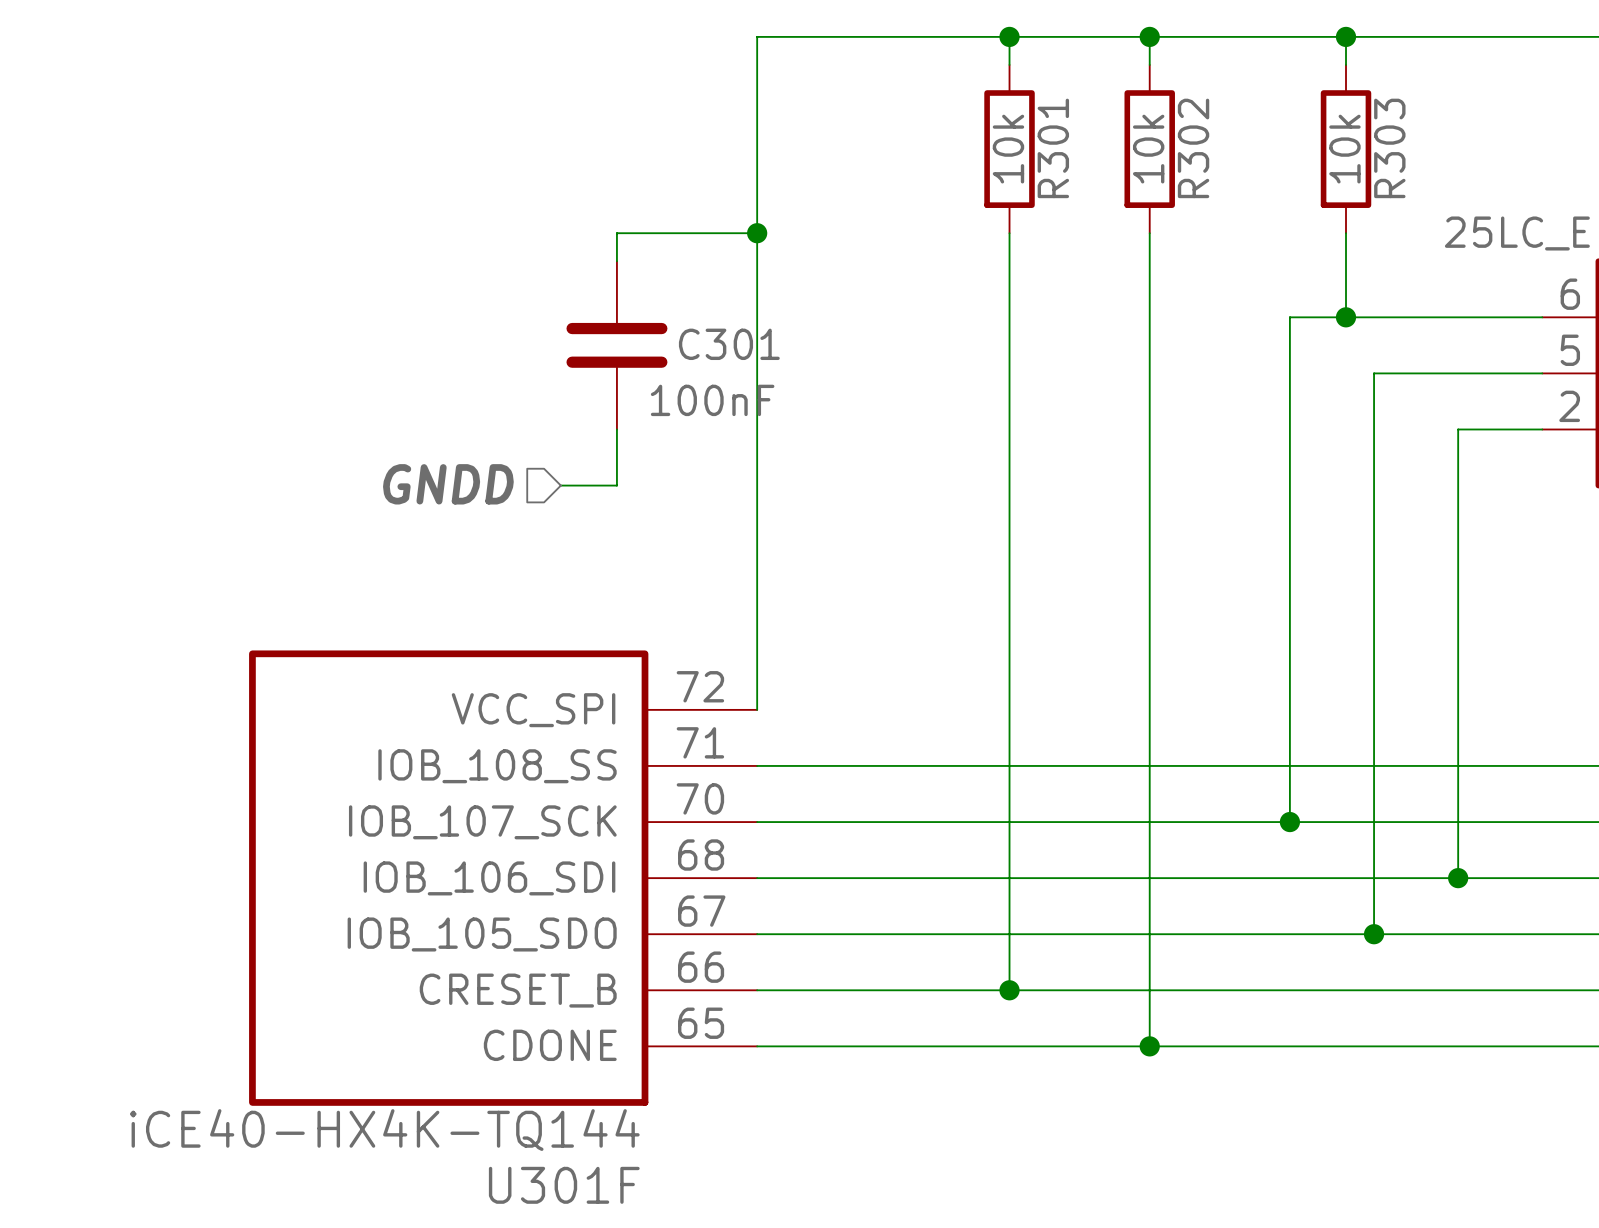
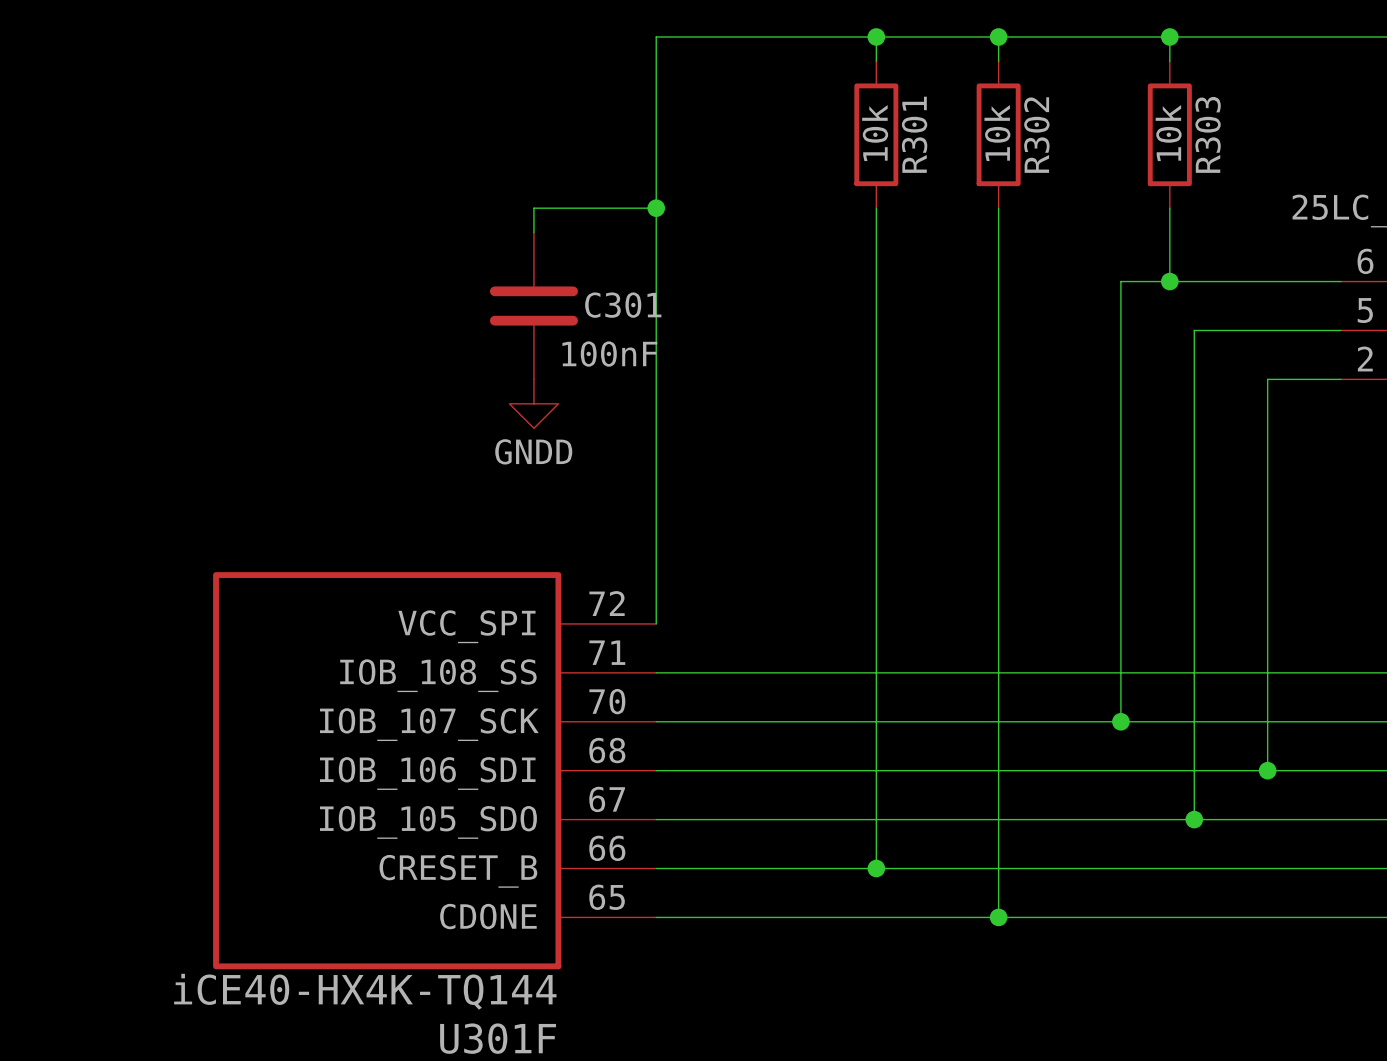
wire: (616, 429) (616, 485) (560, 485) -> none
power symbol: none -> GNDD (533, 403)
hierarchical label: GNDD (448, 484) -> none

